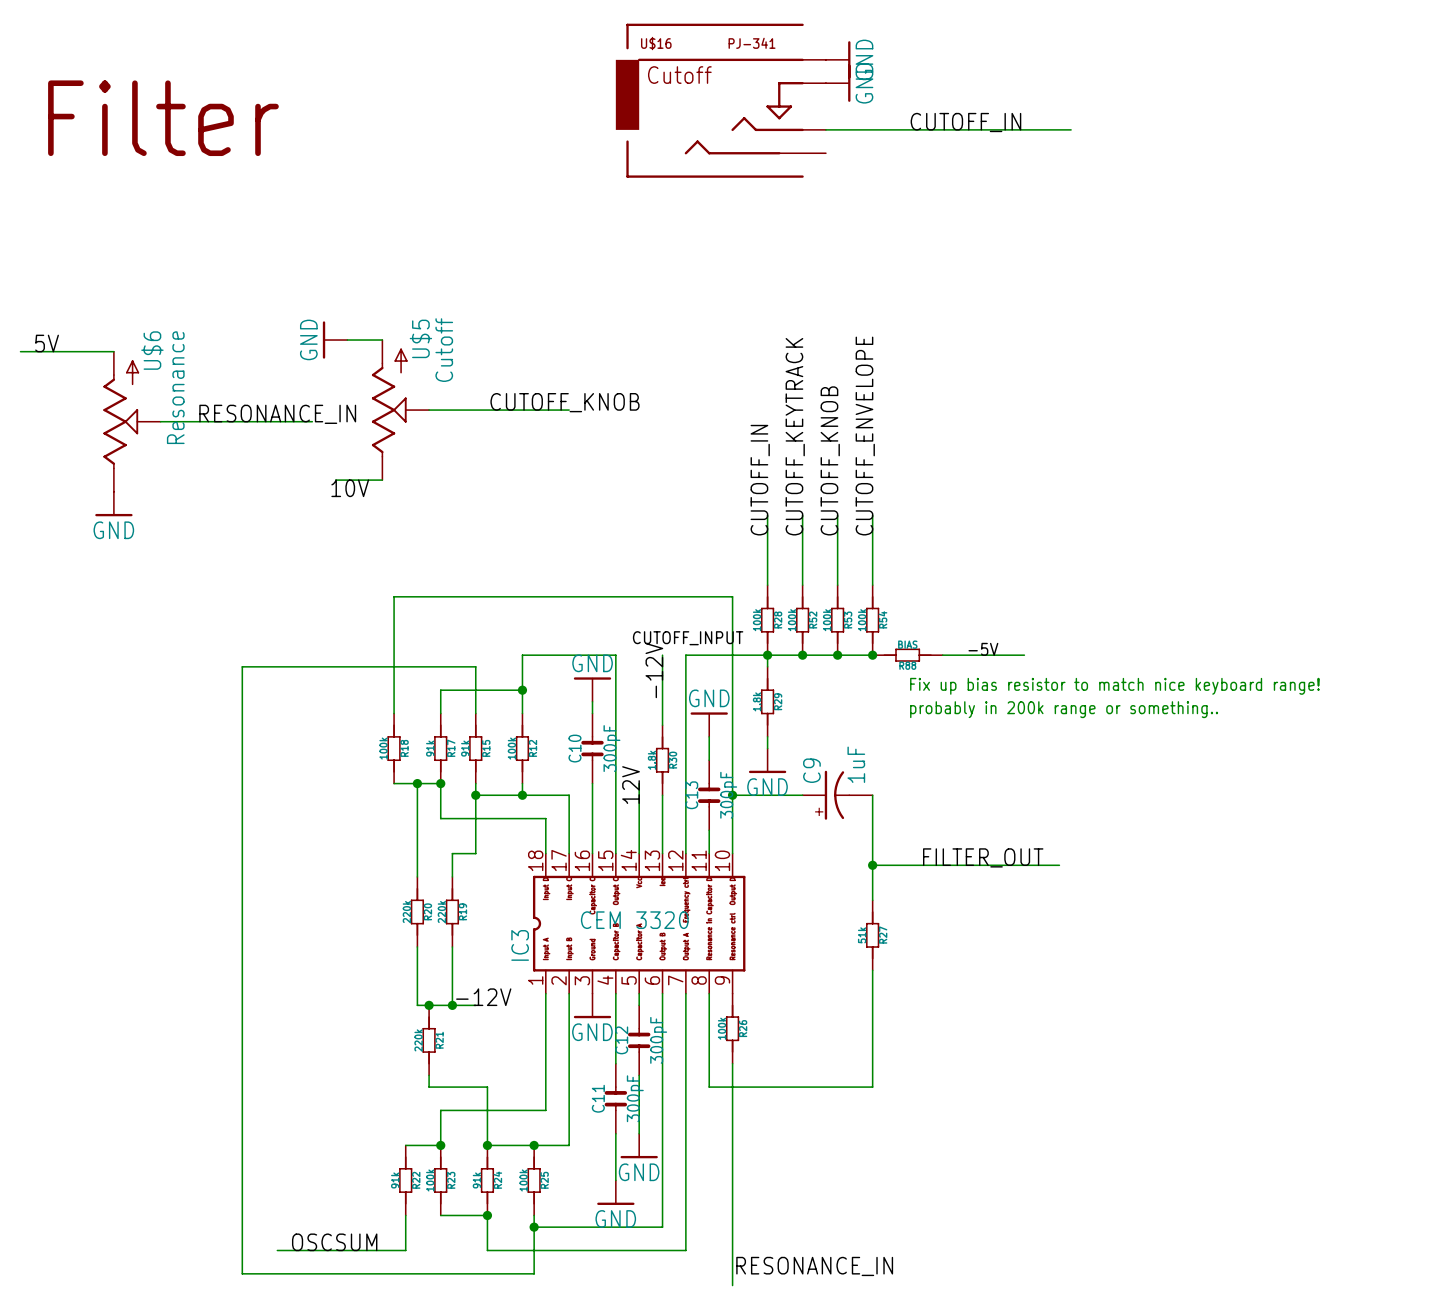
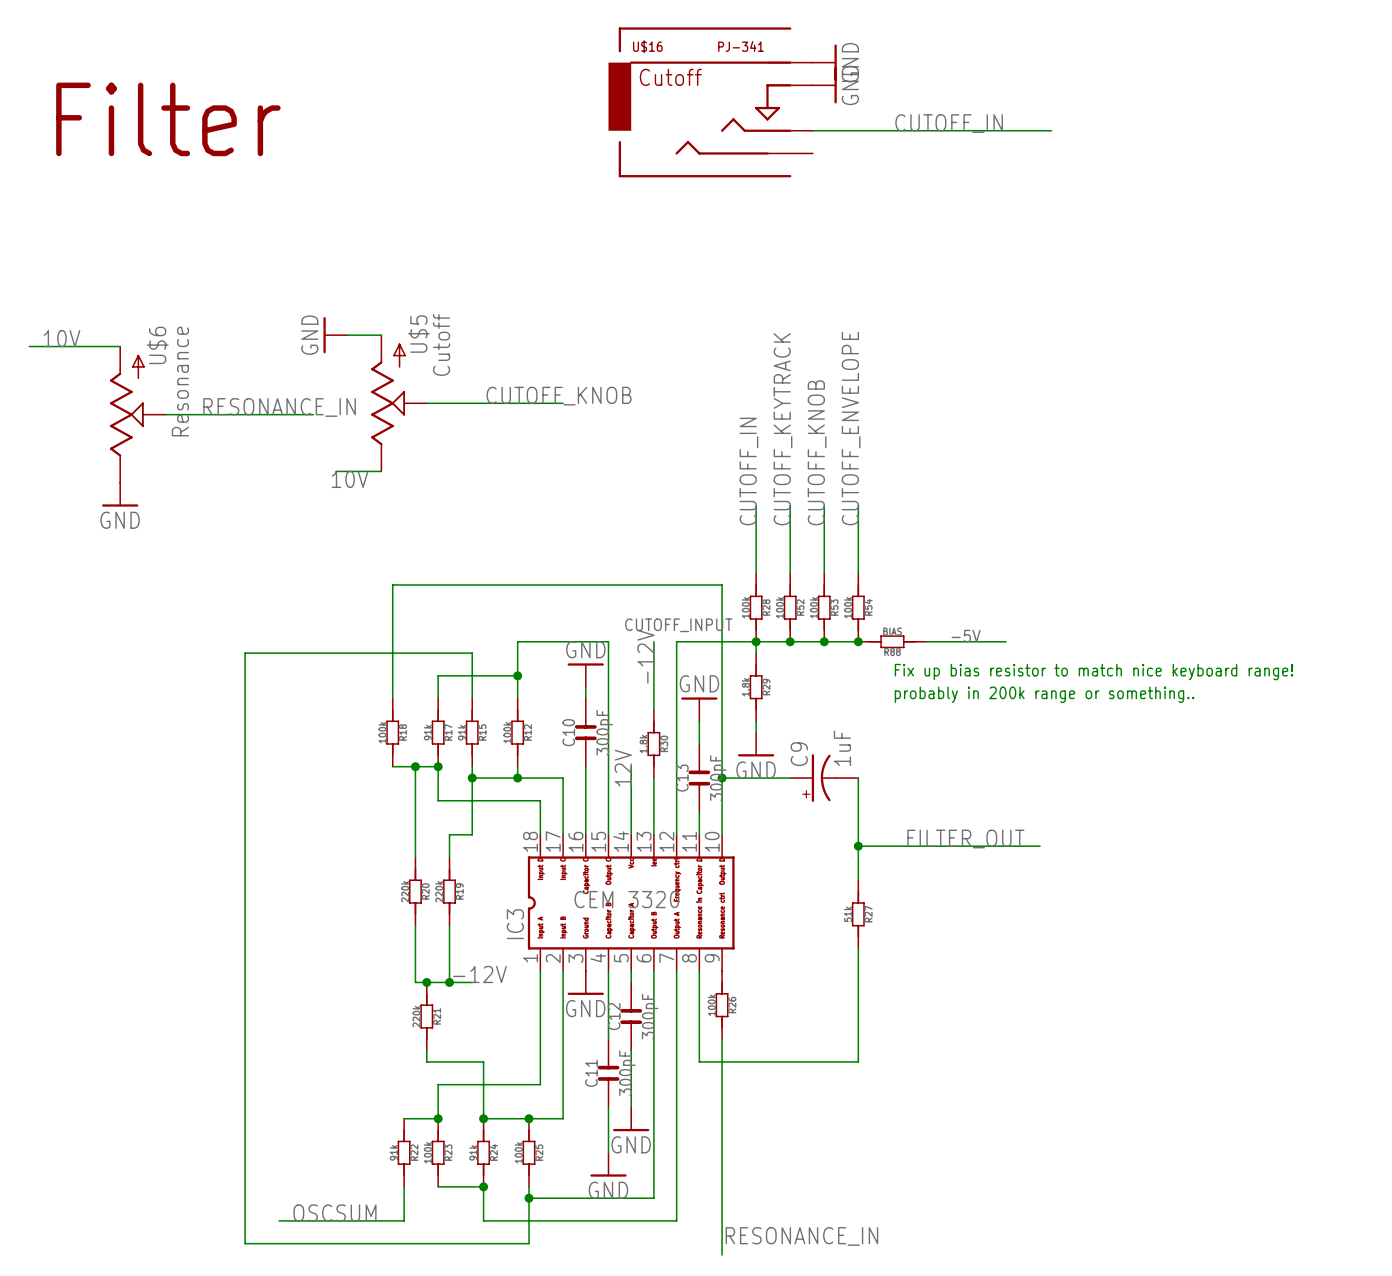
label: 5V (47, 343) -> 10V (61, 338)

